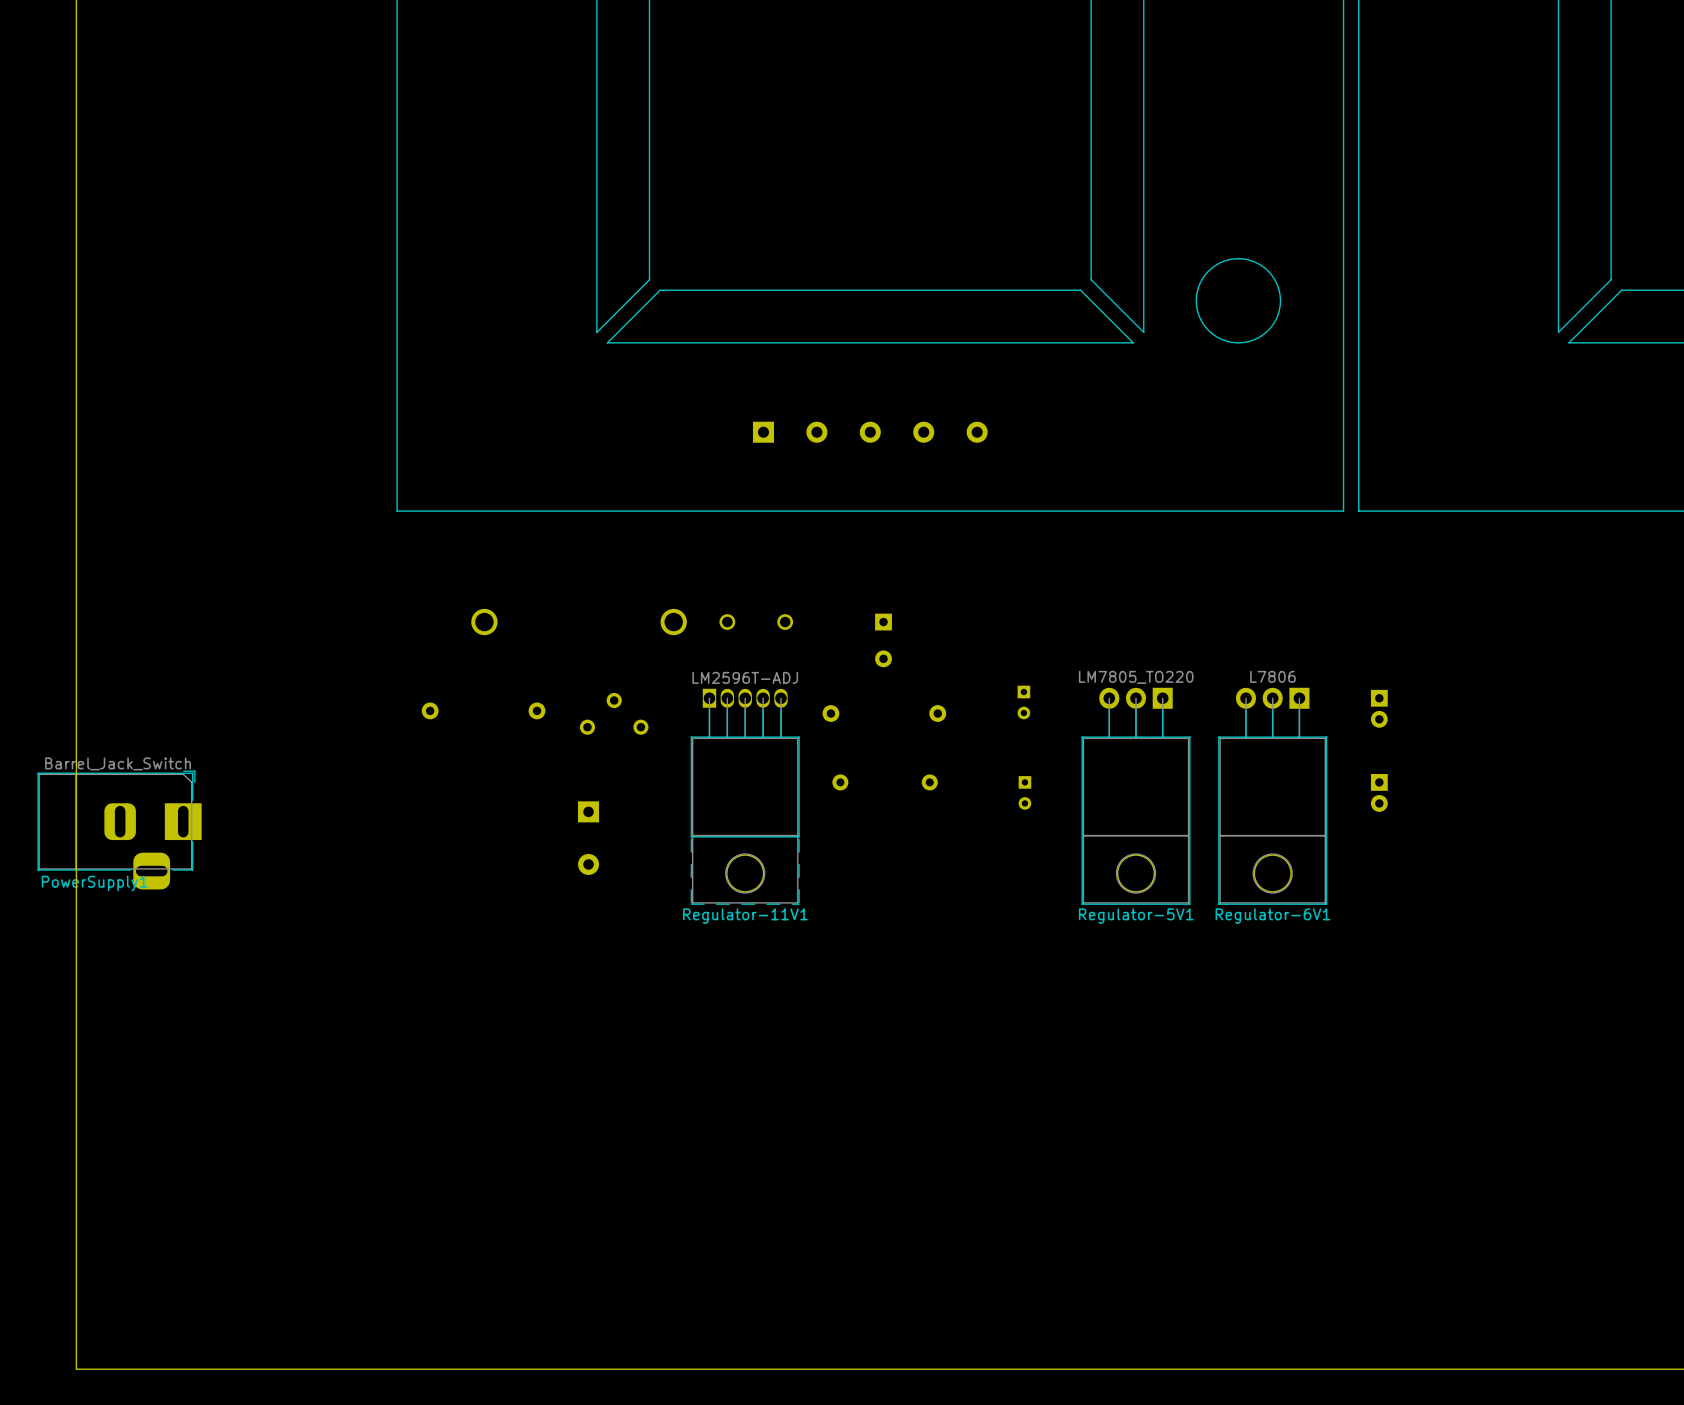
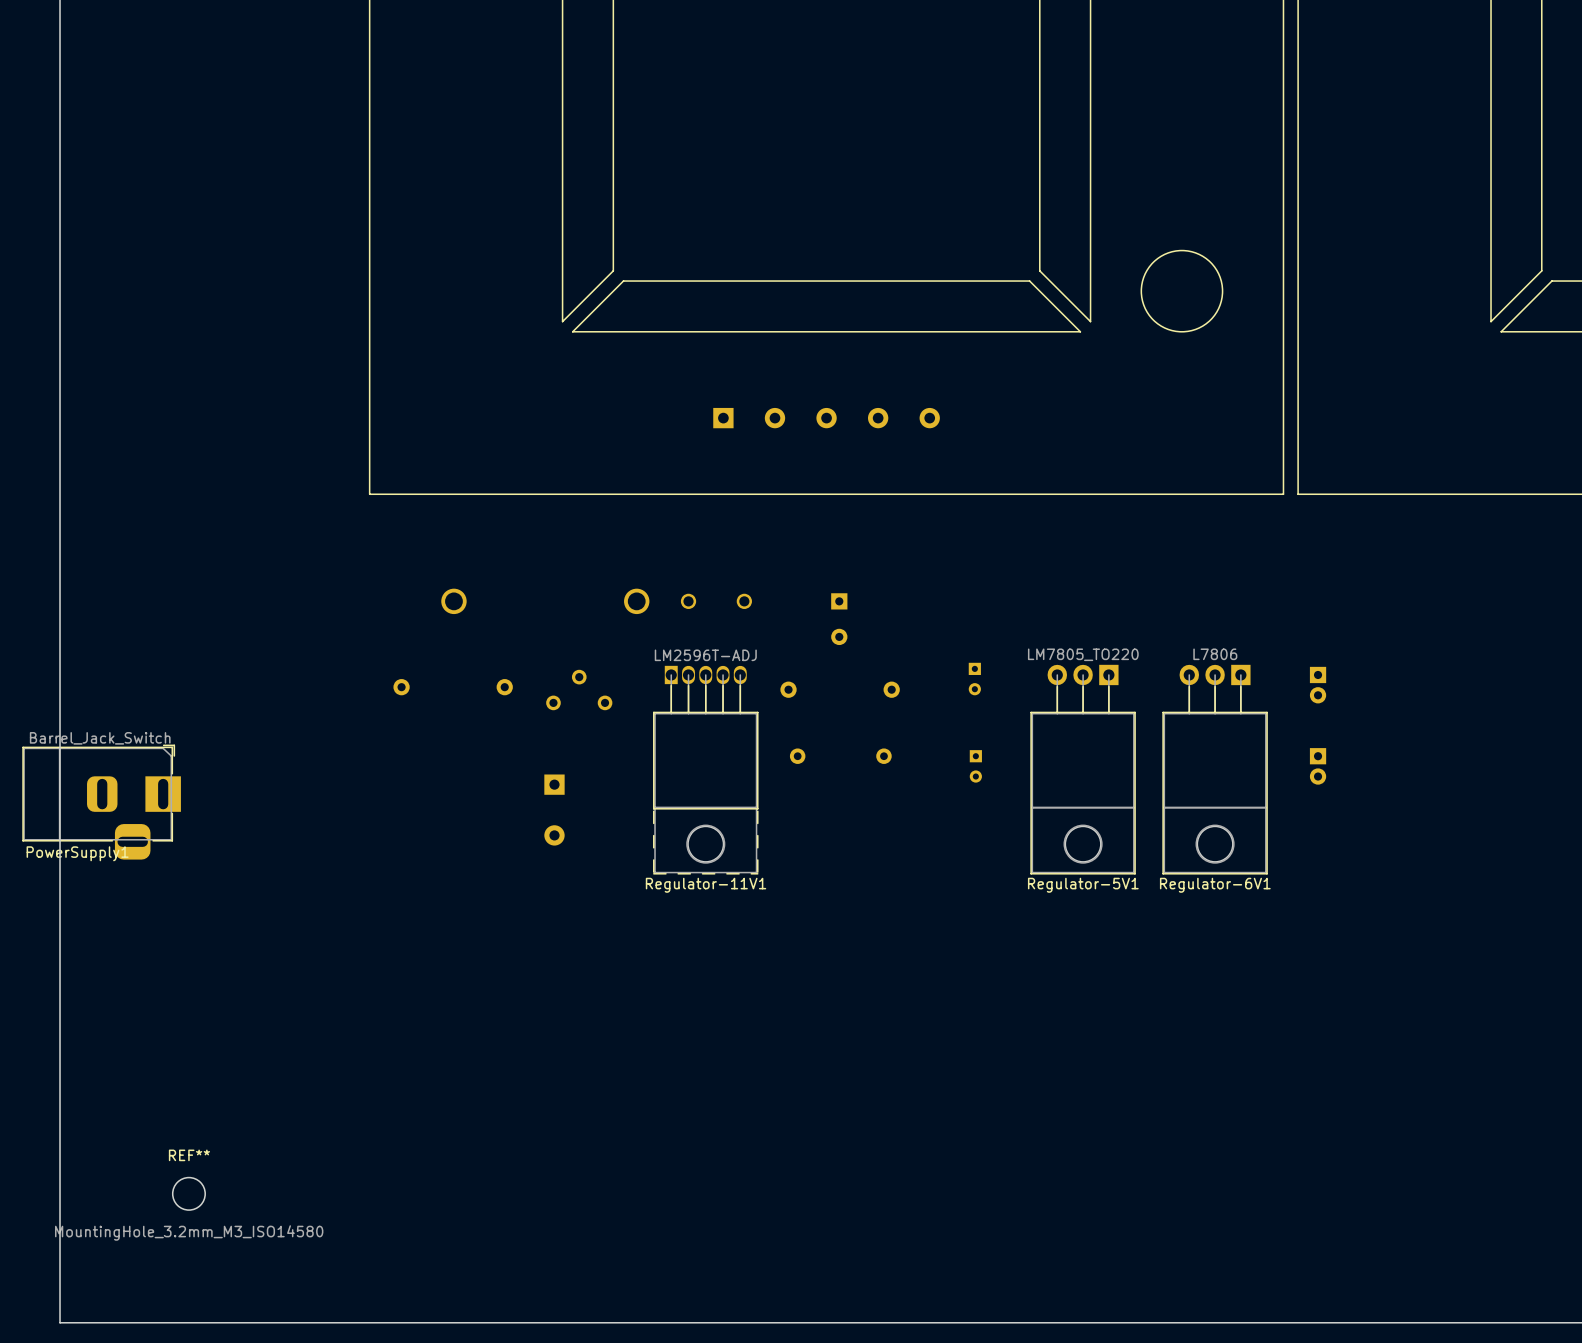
REF**: none -> MountingHole_3.2mm_M3_ISO14580 (188, 1193)

